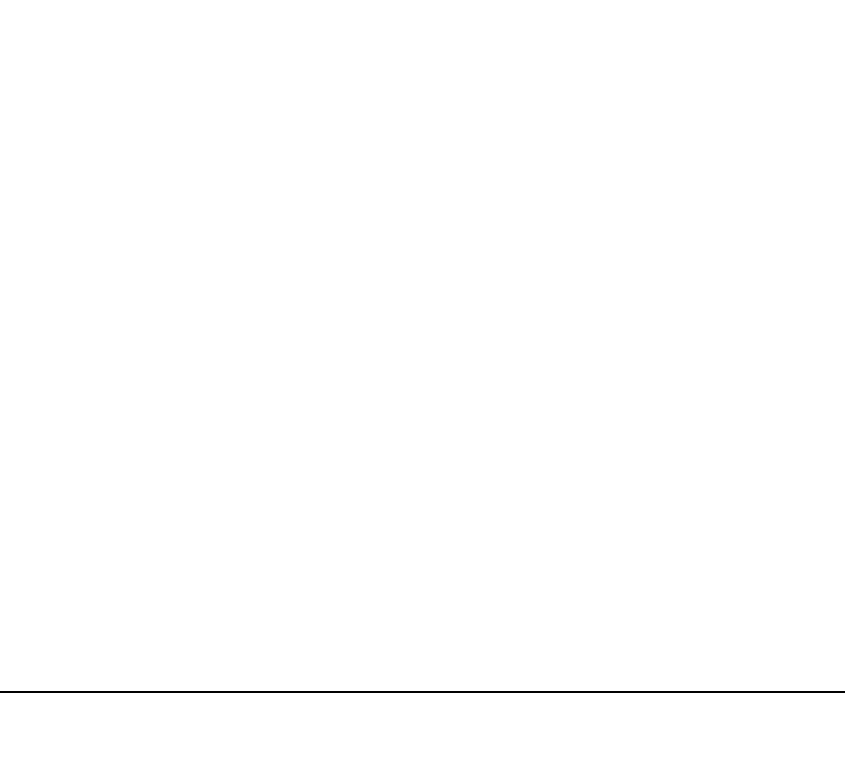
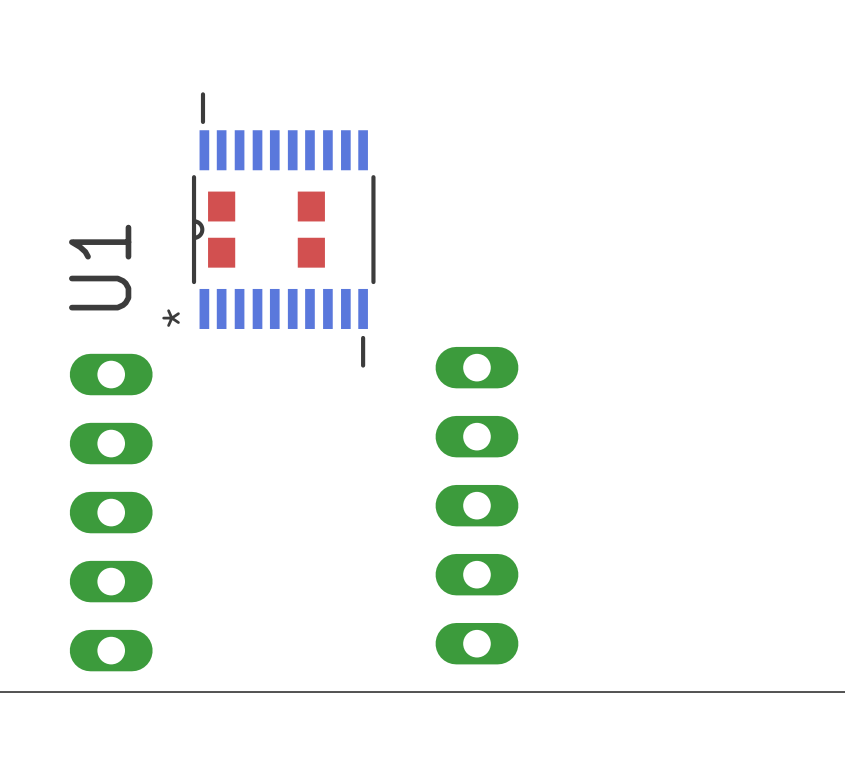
part: none -> (221, 229)
U1: none -> (283, 229)
part: none -> (311, 229)
part: none -> (476, 505)
part: none -> (111, 512)

